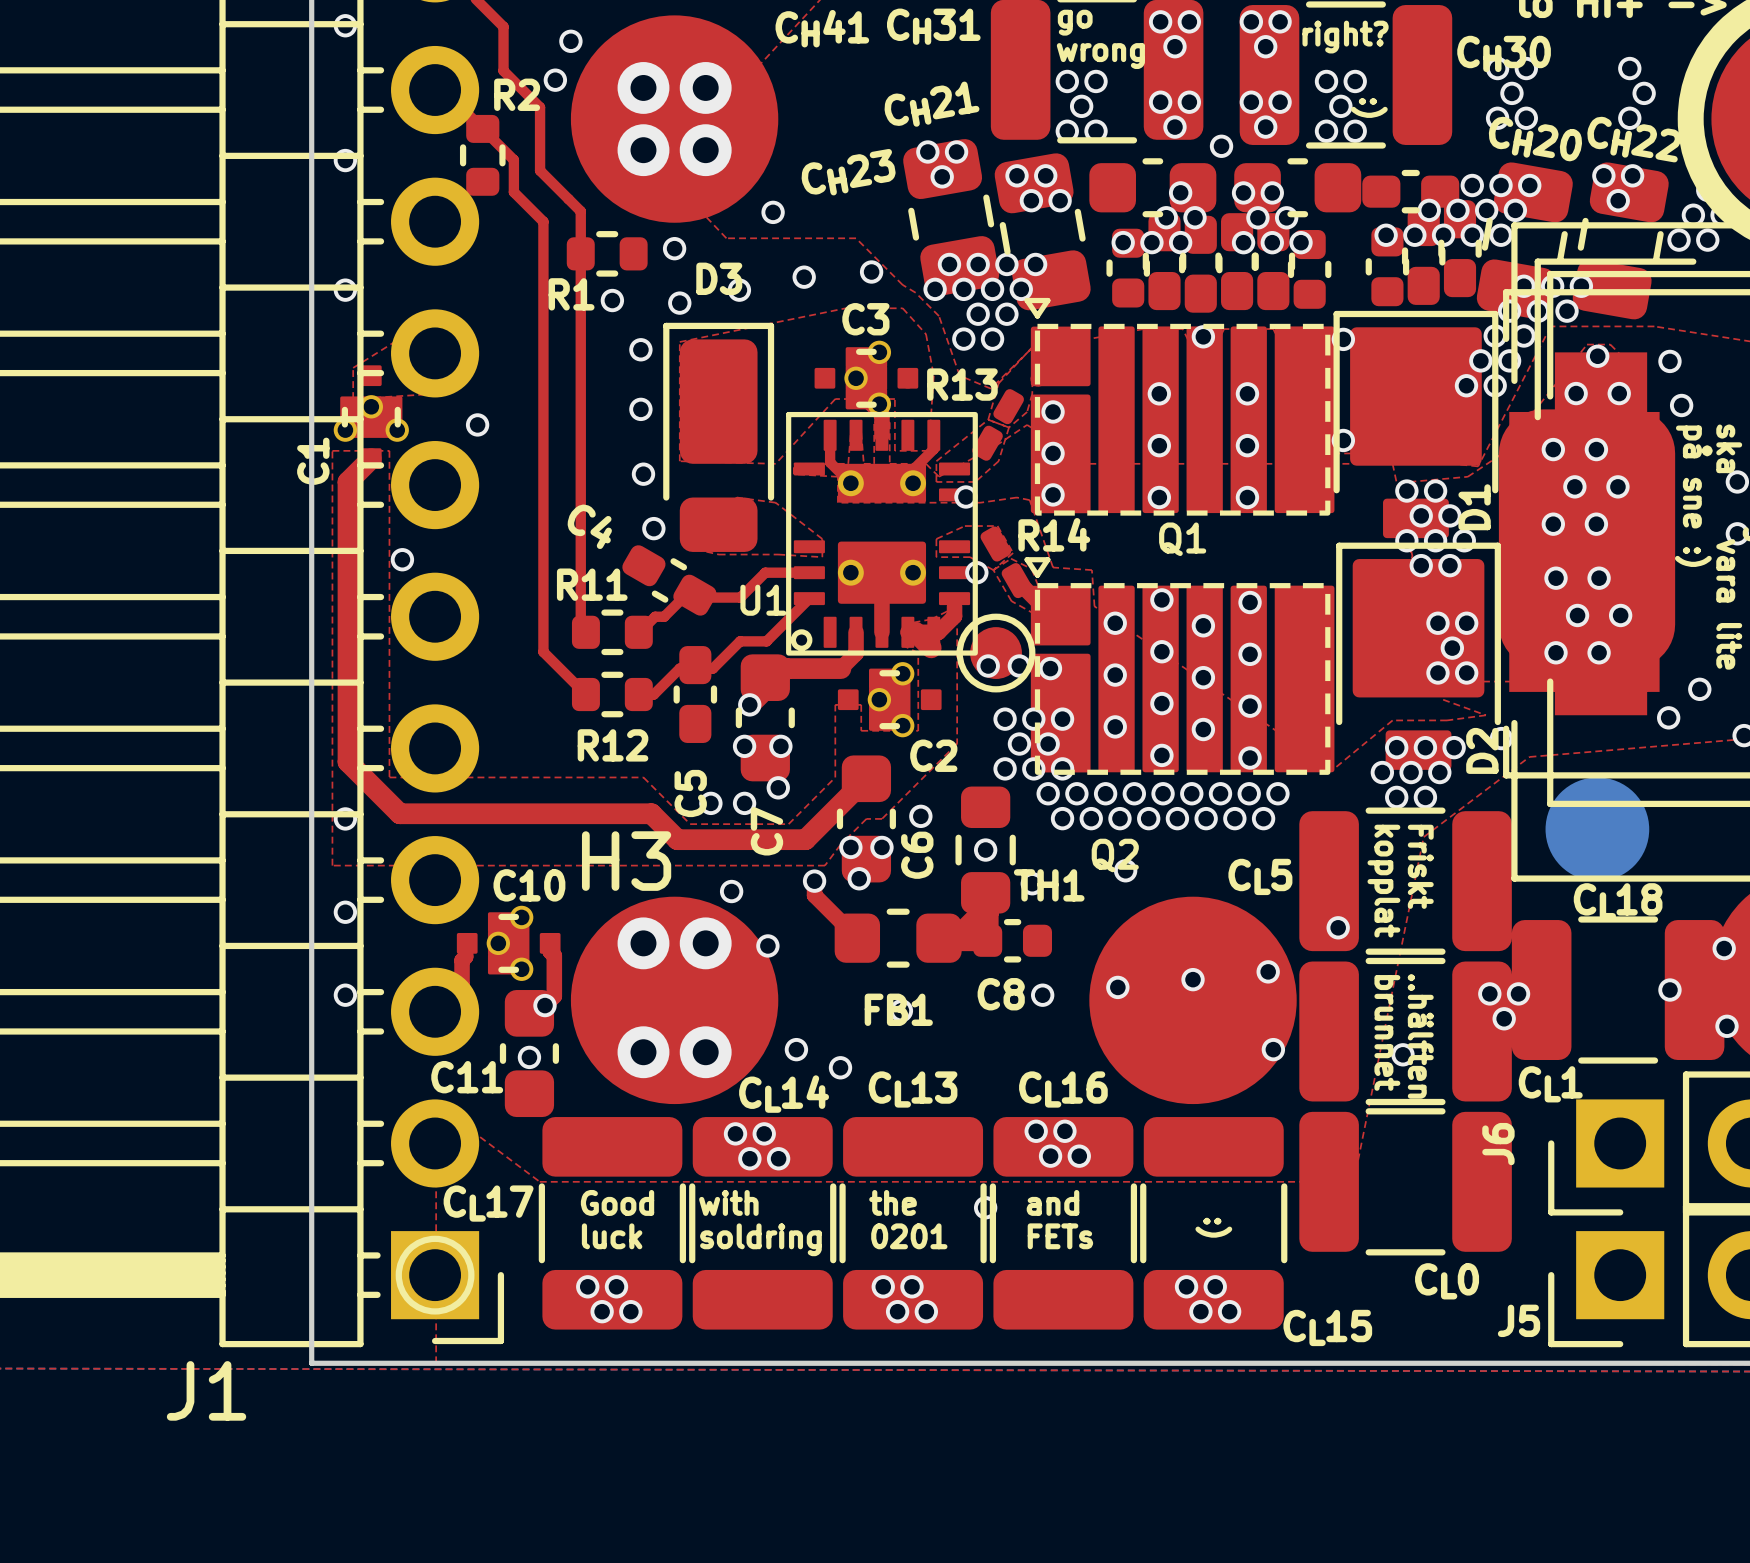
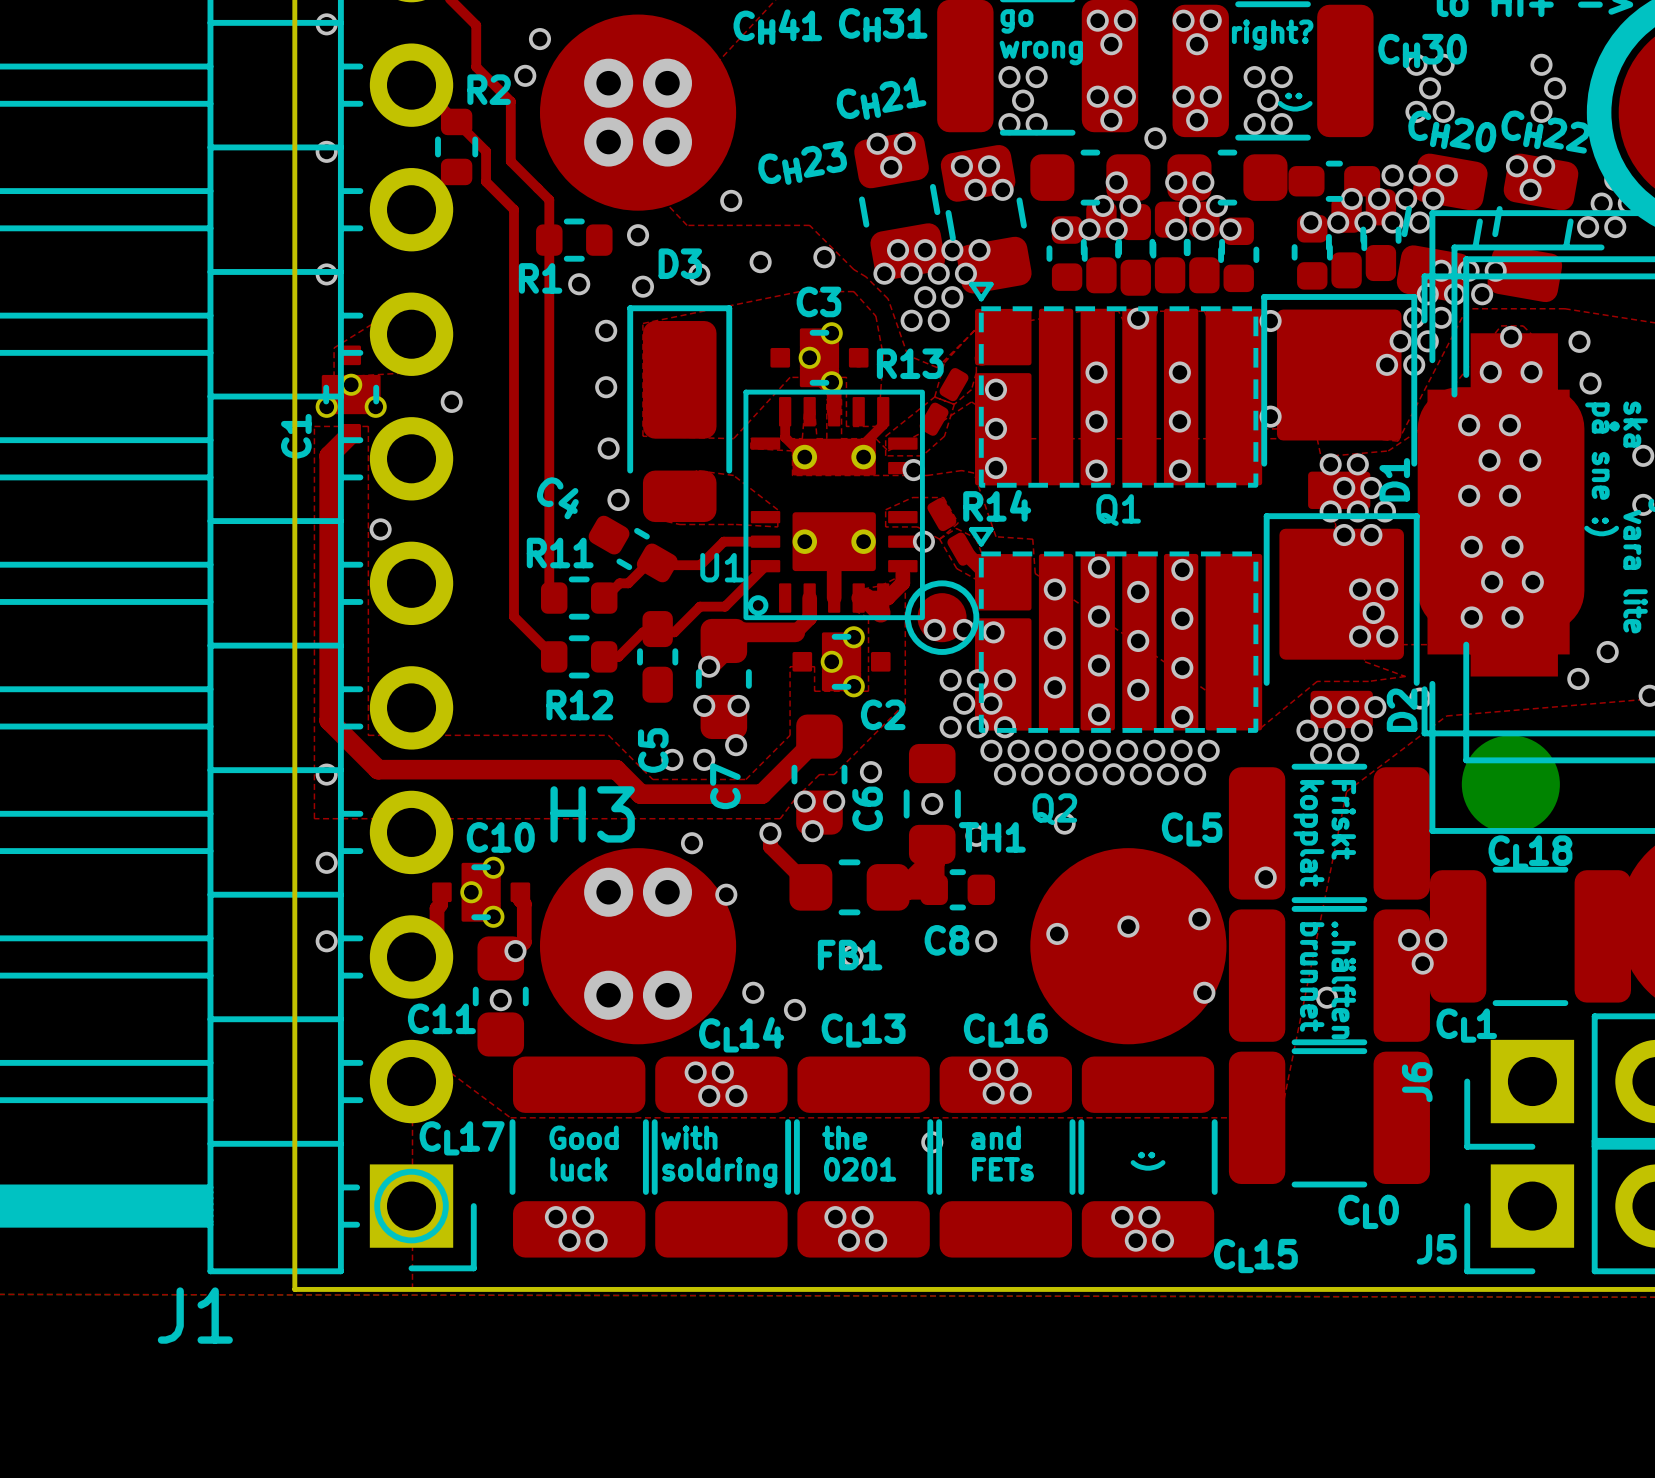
via: (1724, 948) -> none
via: (1669, 990) -> none
via: (1726, 1026) -> none

